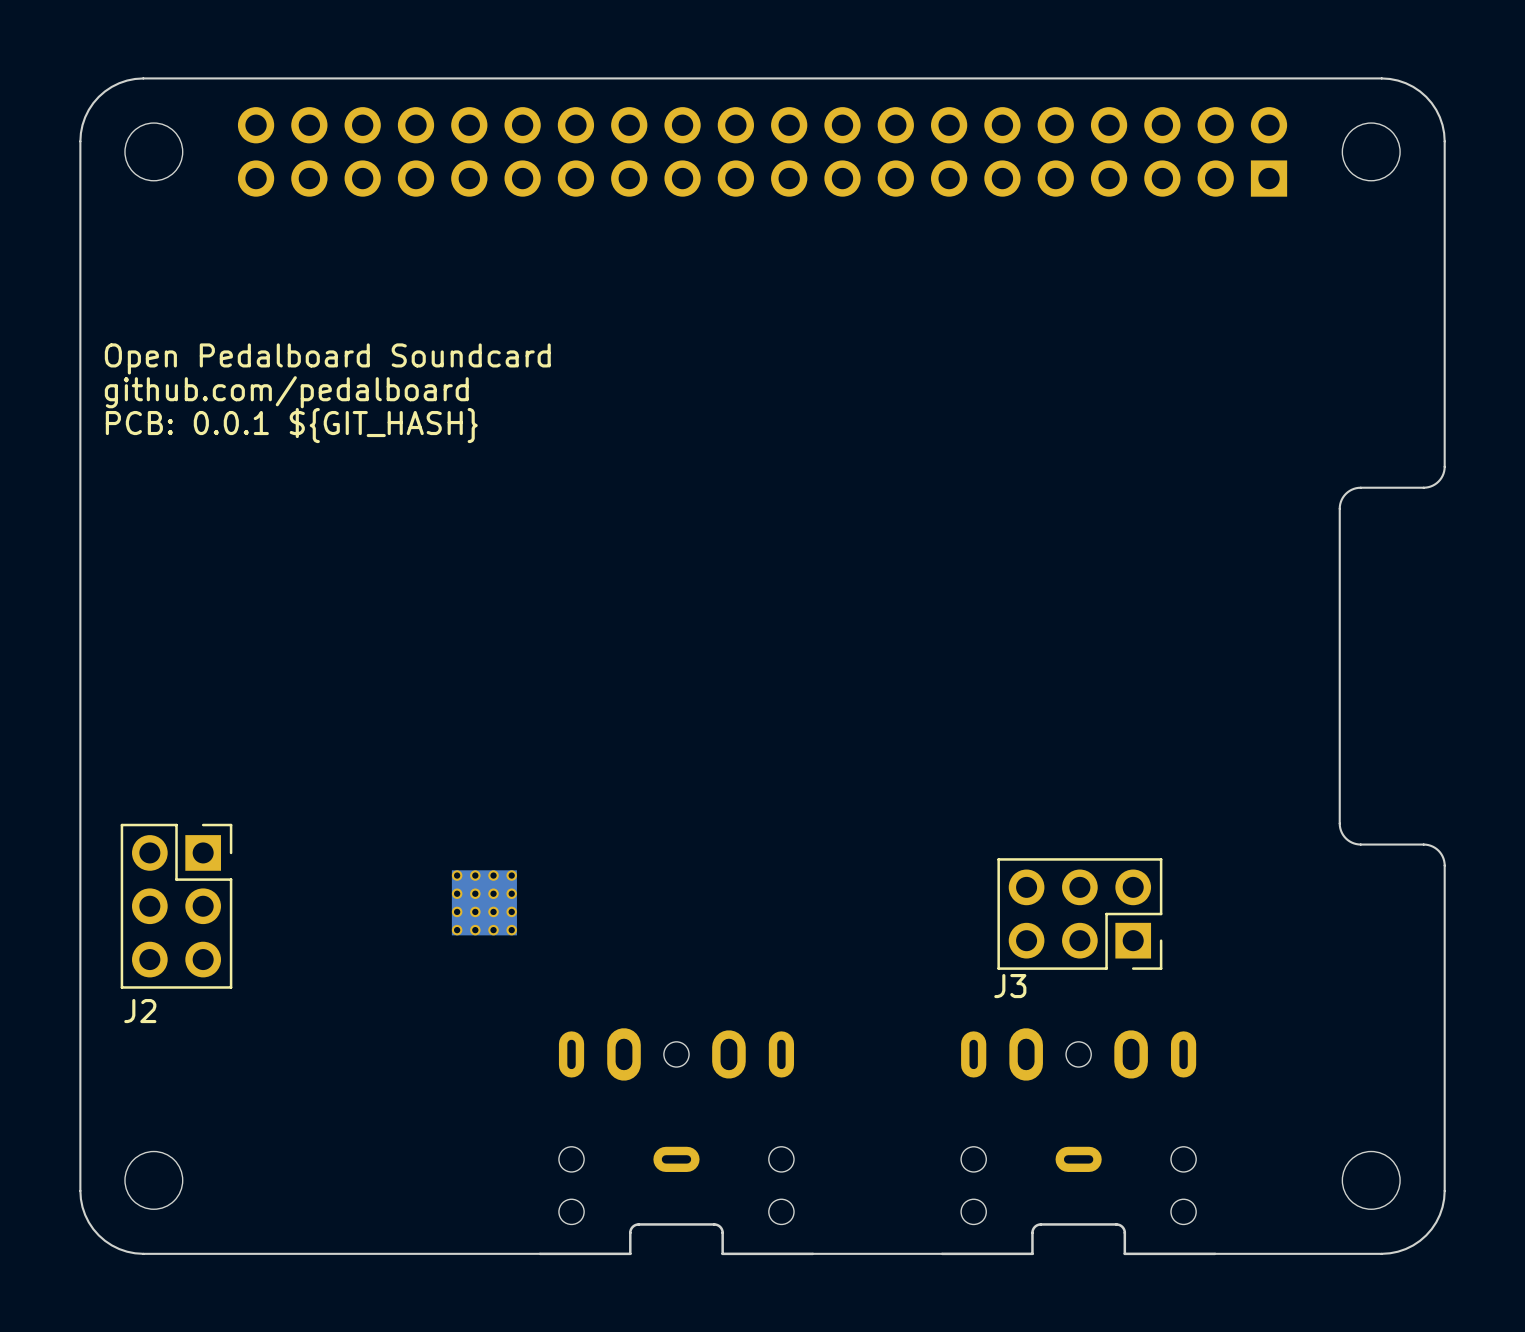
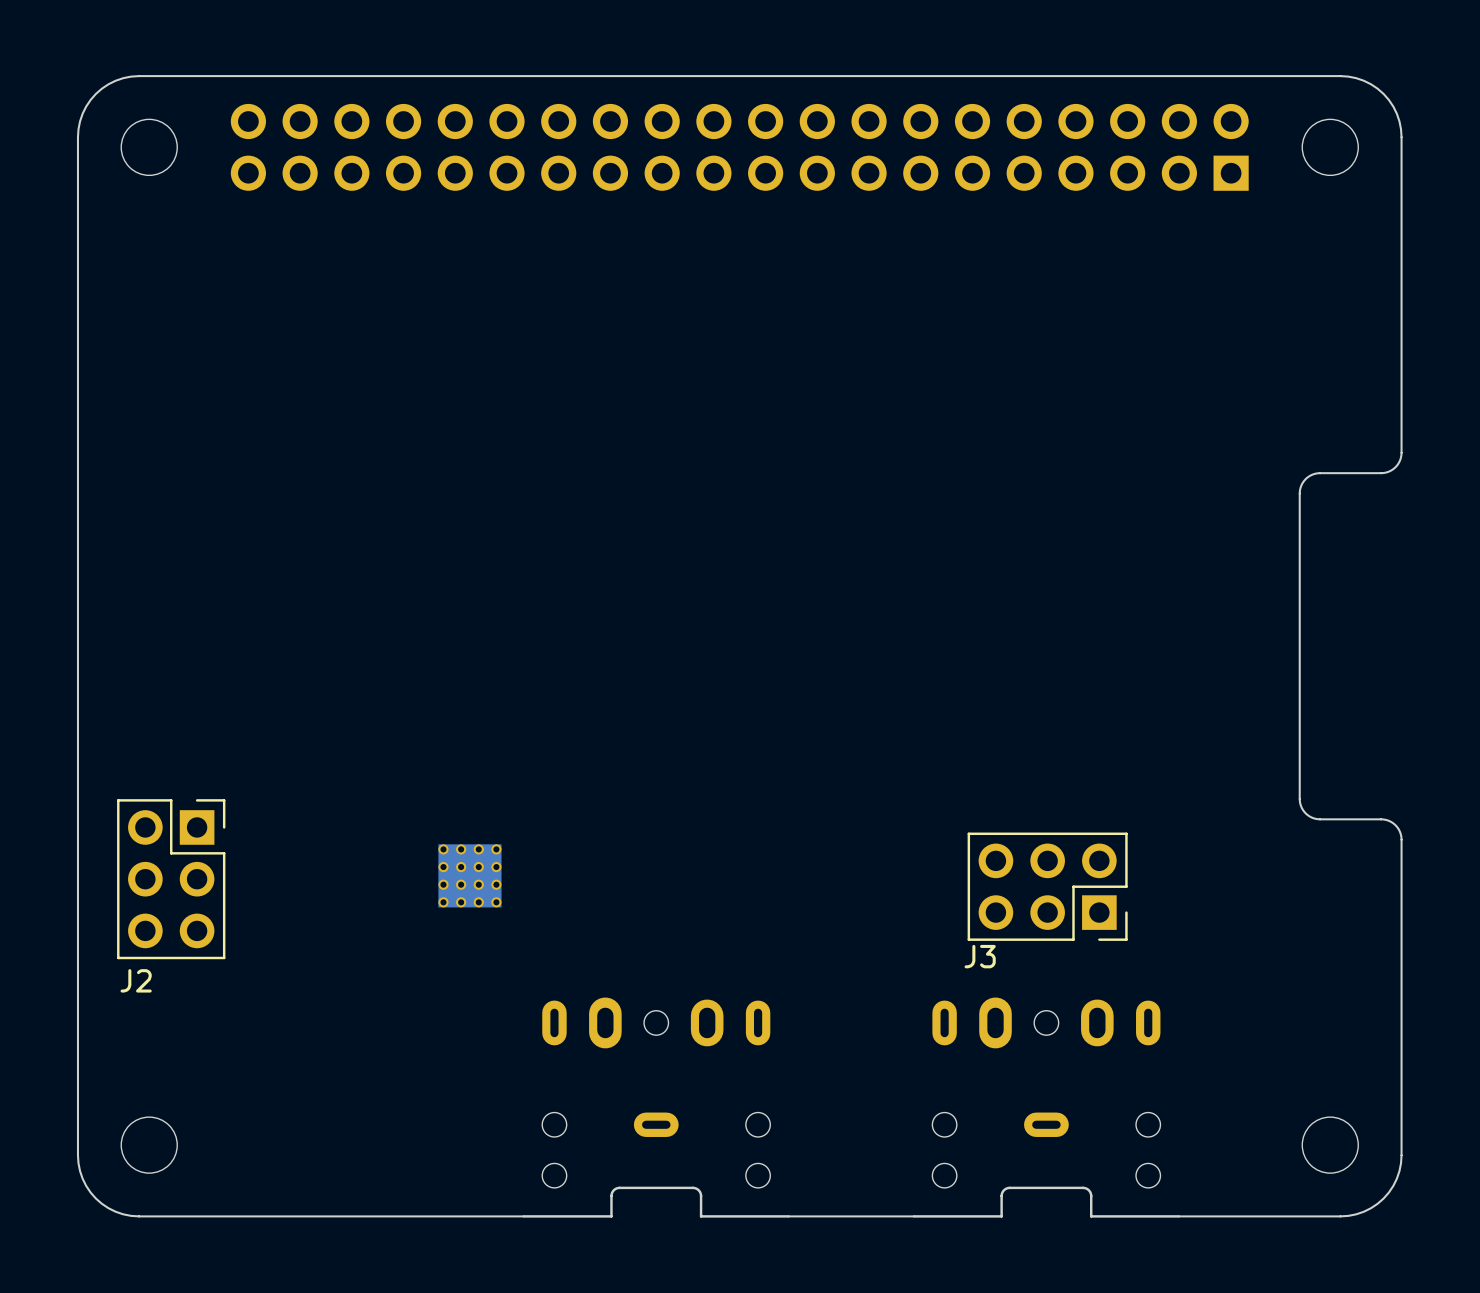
text: Open Pedalboard Soundcard (327, 358) -> none
text: github.com/pedalboard (286, 392) -> none
text: PCB: 0.0.1 ${GIT_HASH} (291, 425) -> none

